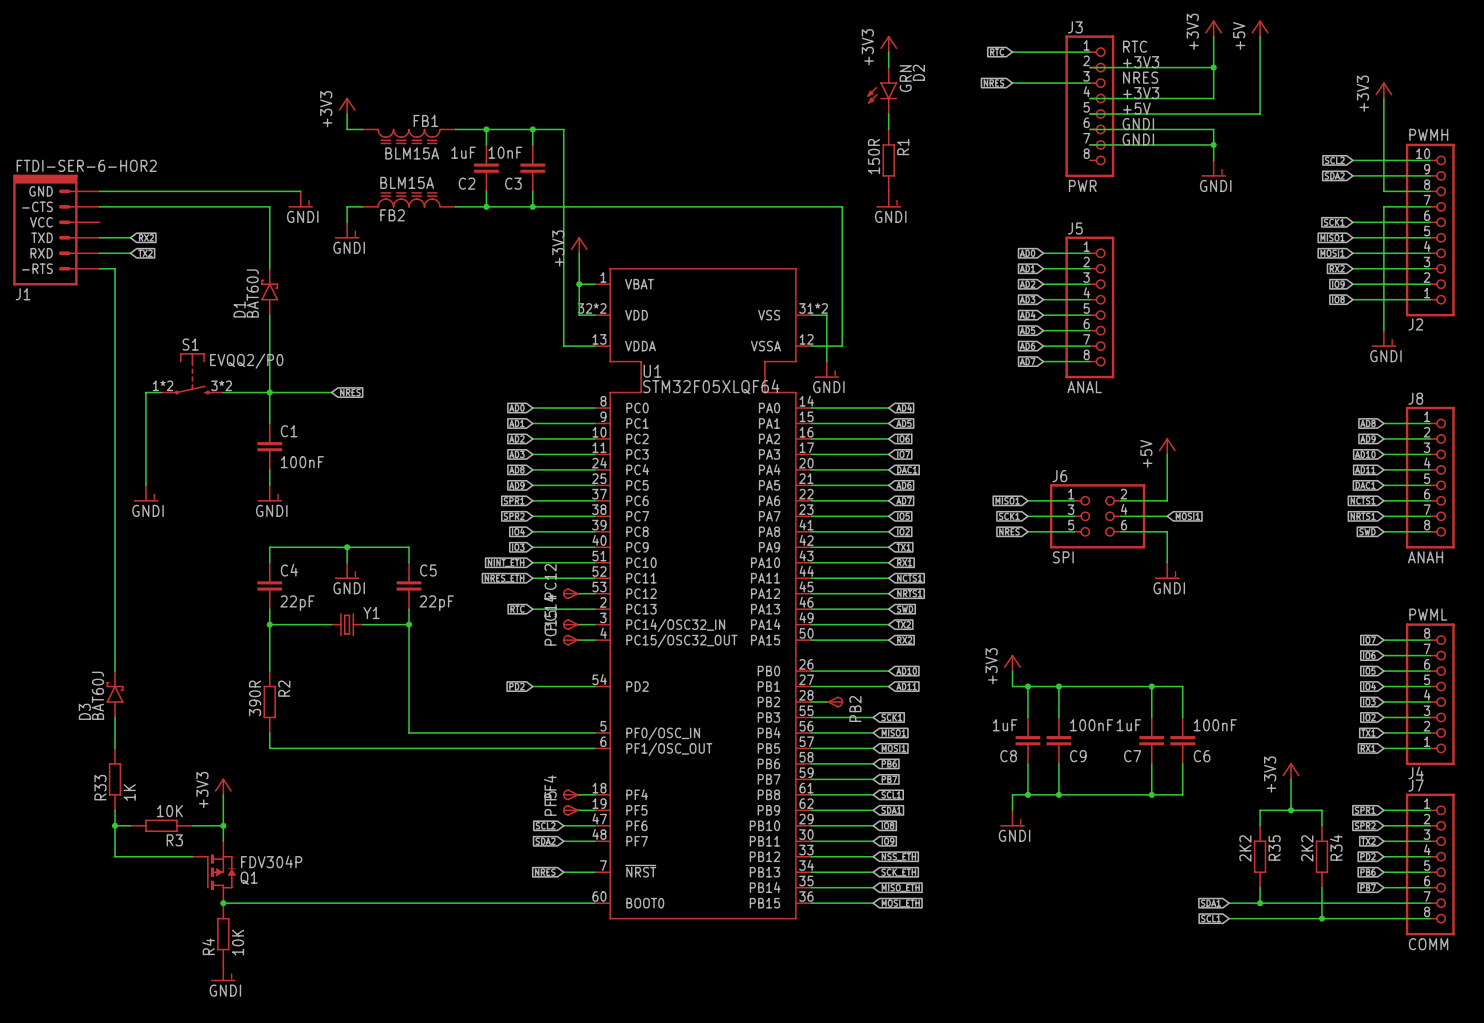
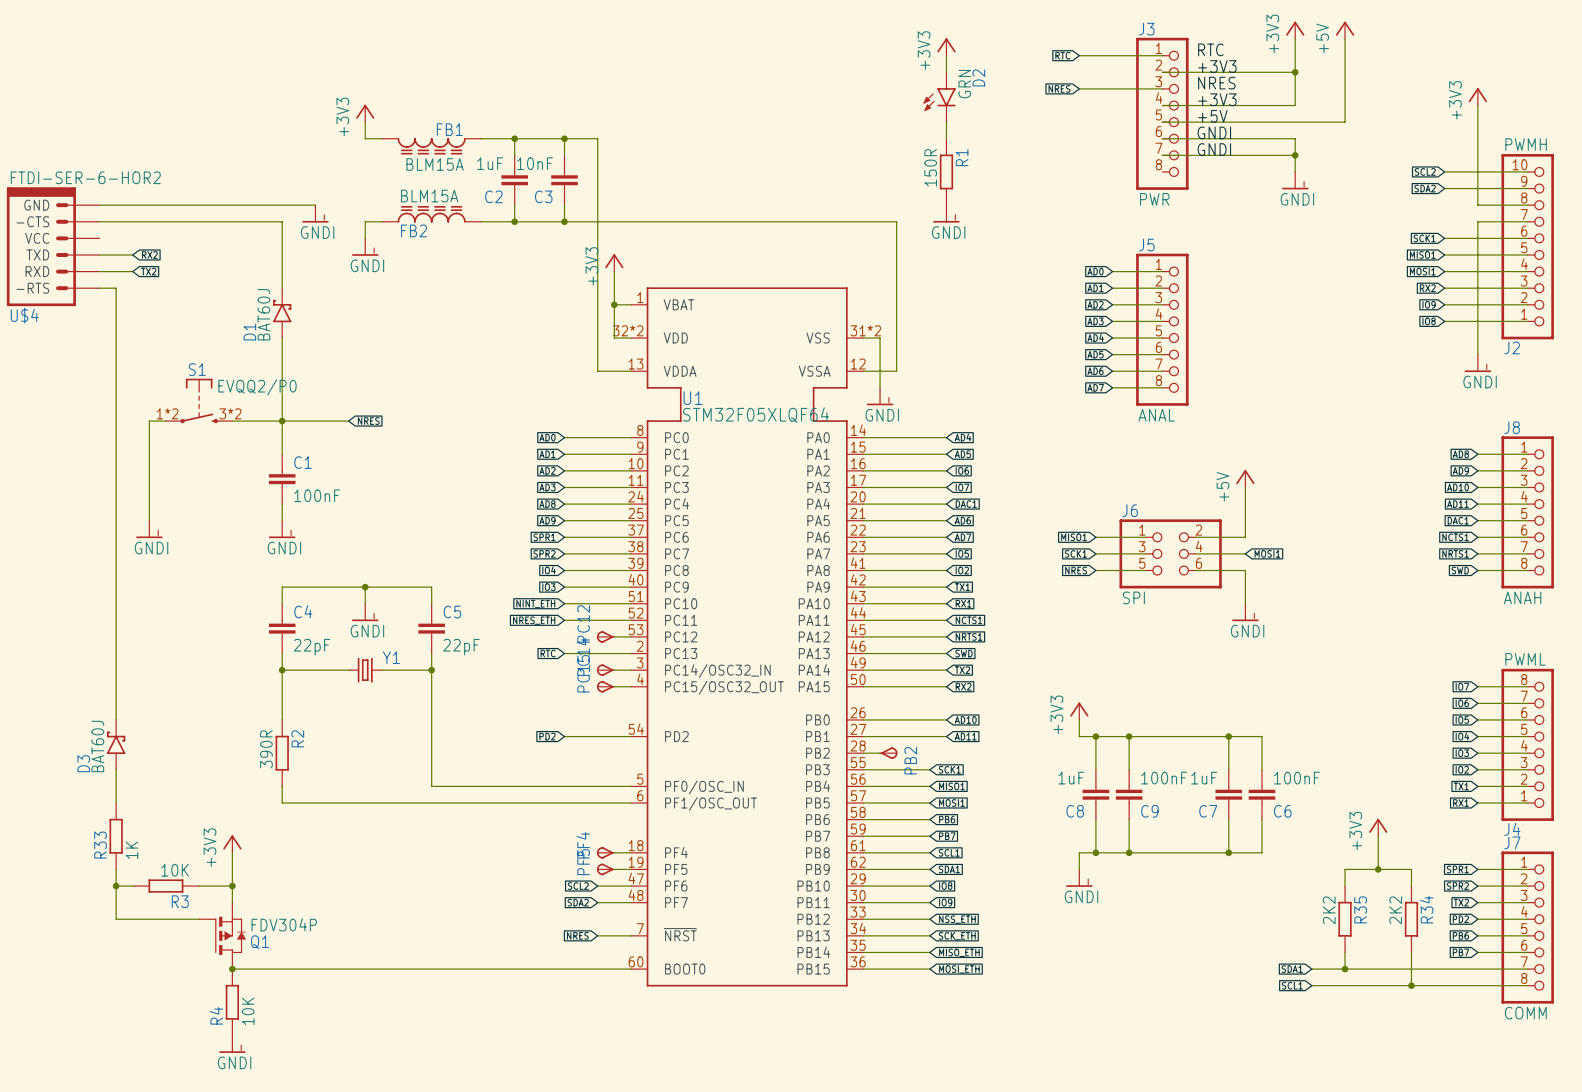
J1 name: J1 (23, 294) -> U$4 (24, 315)

